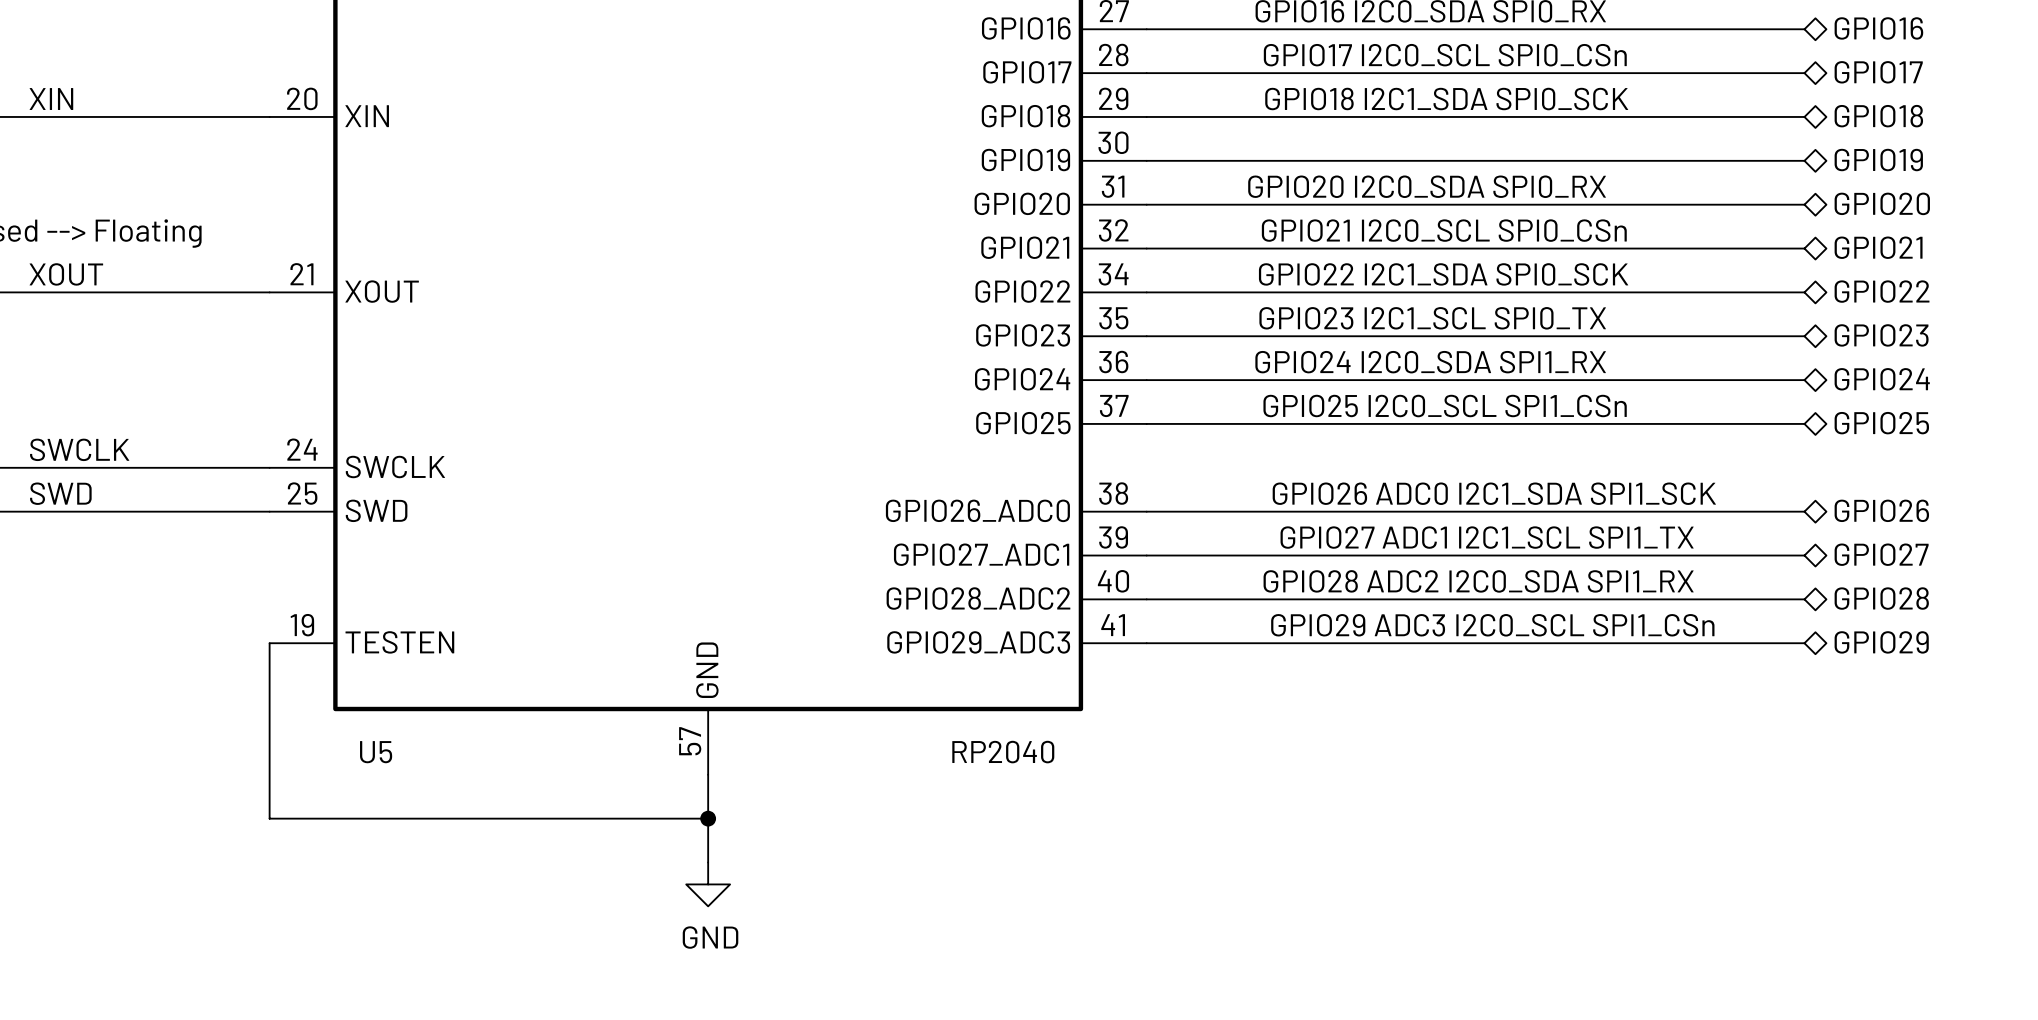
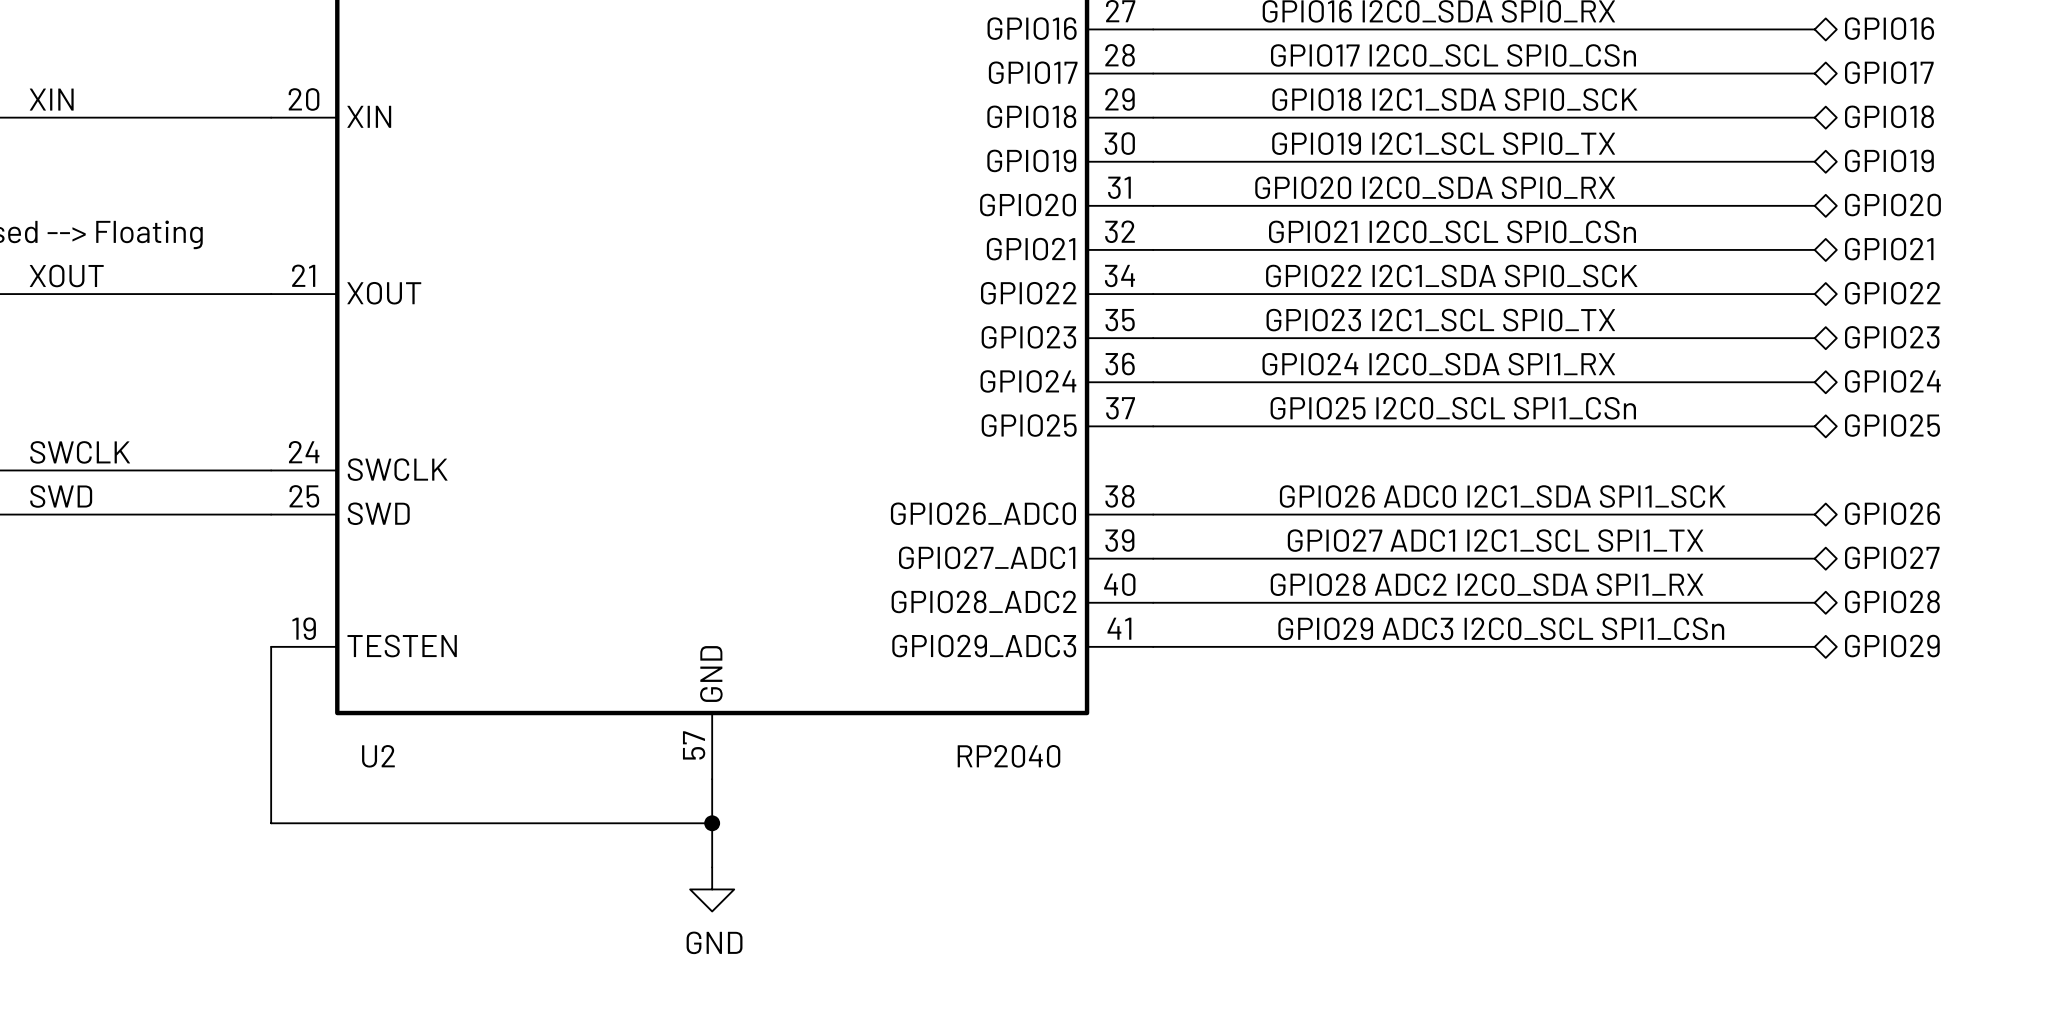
text: none -> GPIO19 I2C1_SCL SPI0_TX (1443, 143)
U5 name: U5 (376, 752) -> U2 (378, 756)

